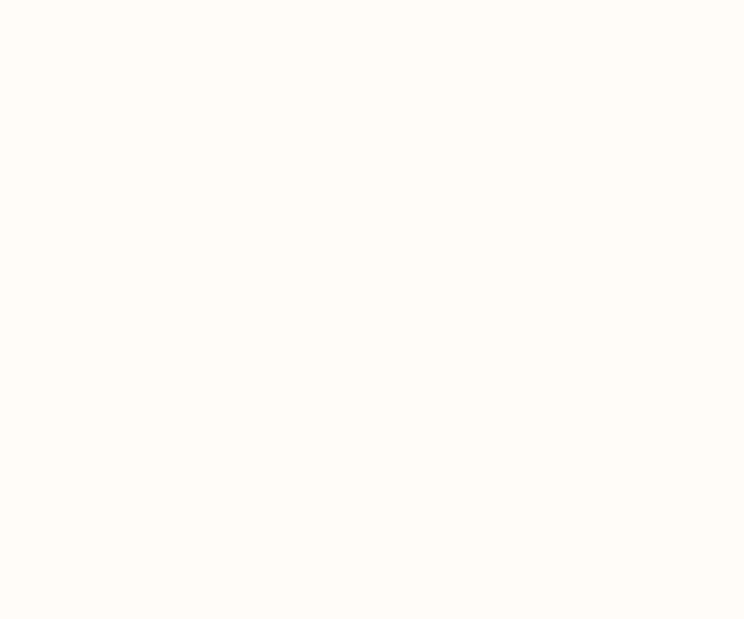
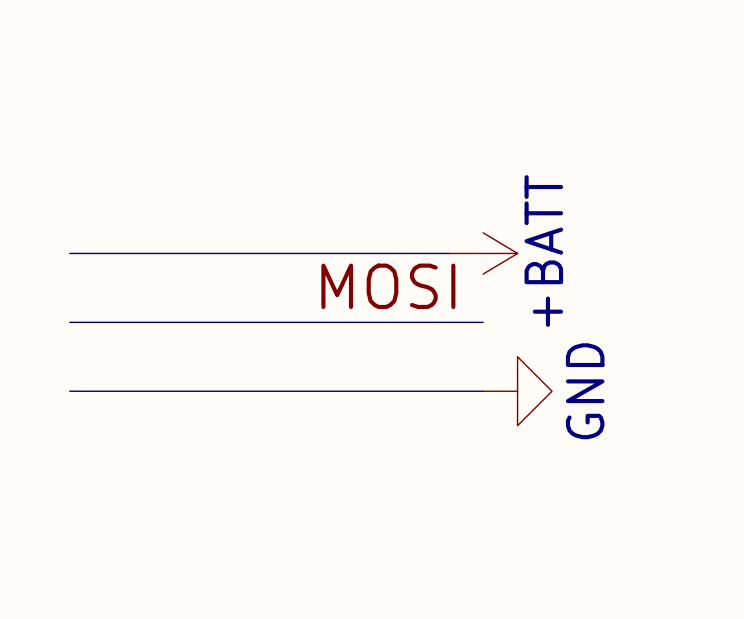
wire: none -> (69, 253) (448, 253)
power symbol: none -> +BATT (483, 253)
label: none -> MOSI (388, 286)
wire: none -> (69, 322) (483, 322)
wire: none -> (69, 391) (483, 391)
power symbol: none -> GND (517, 391)

